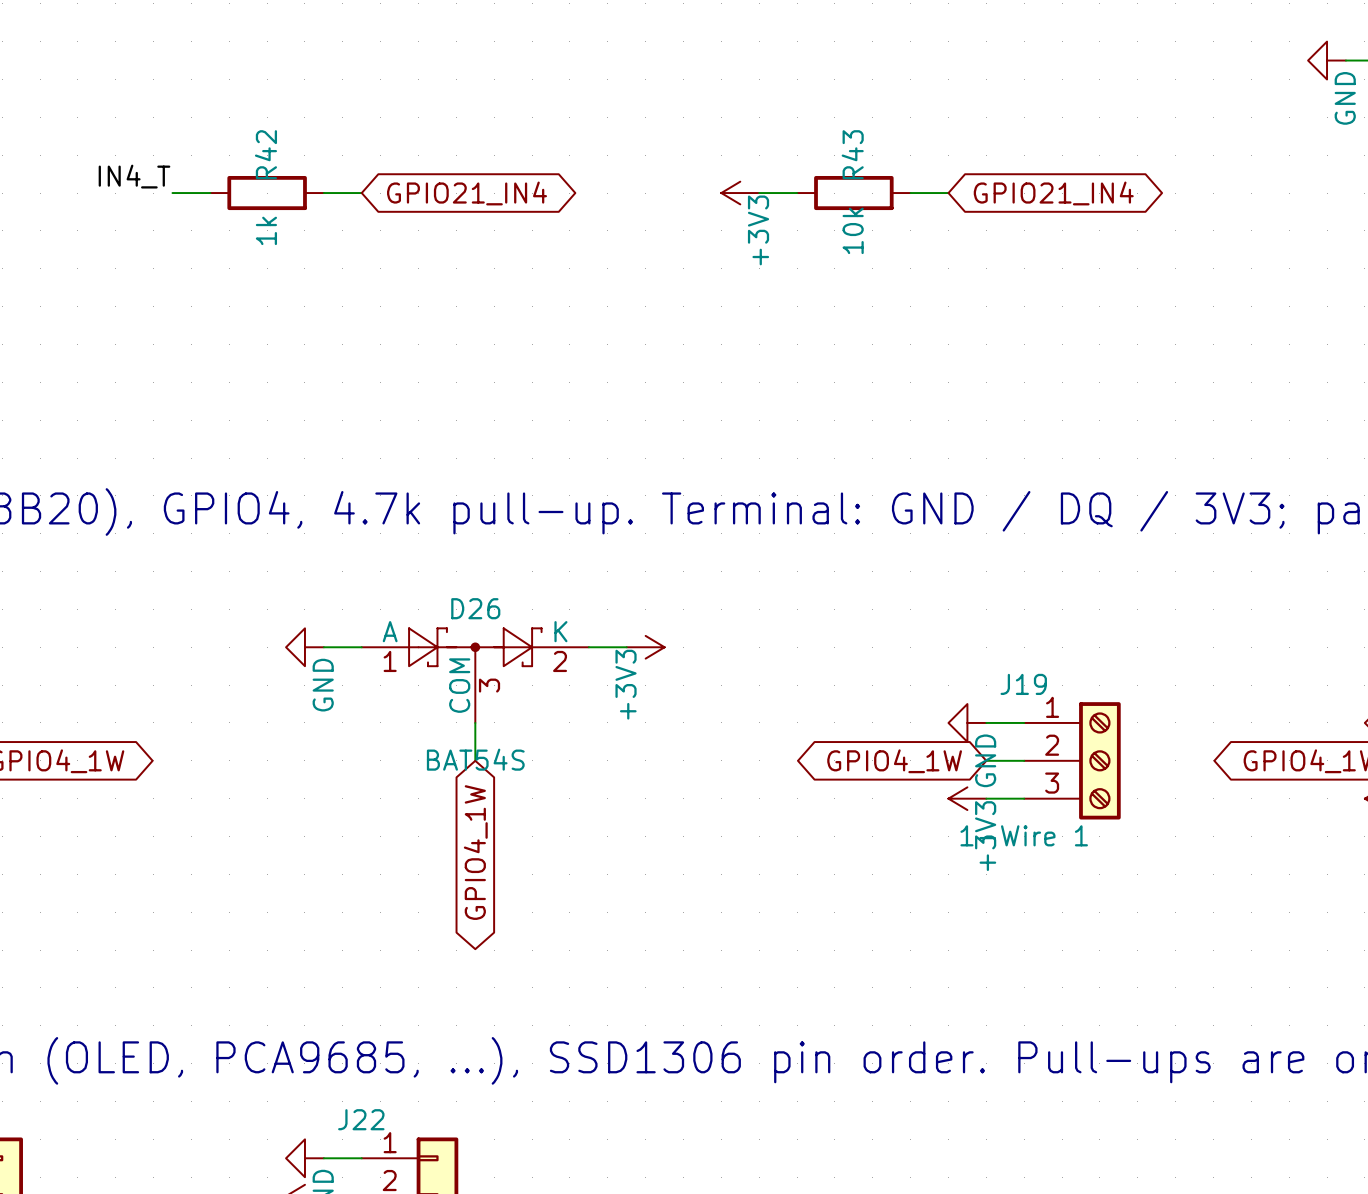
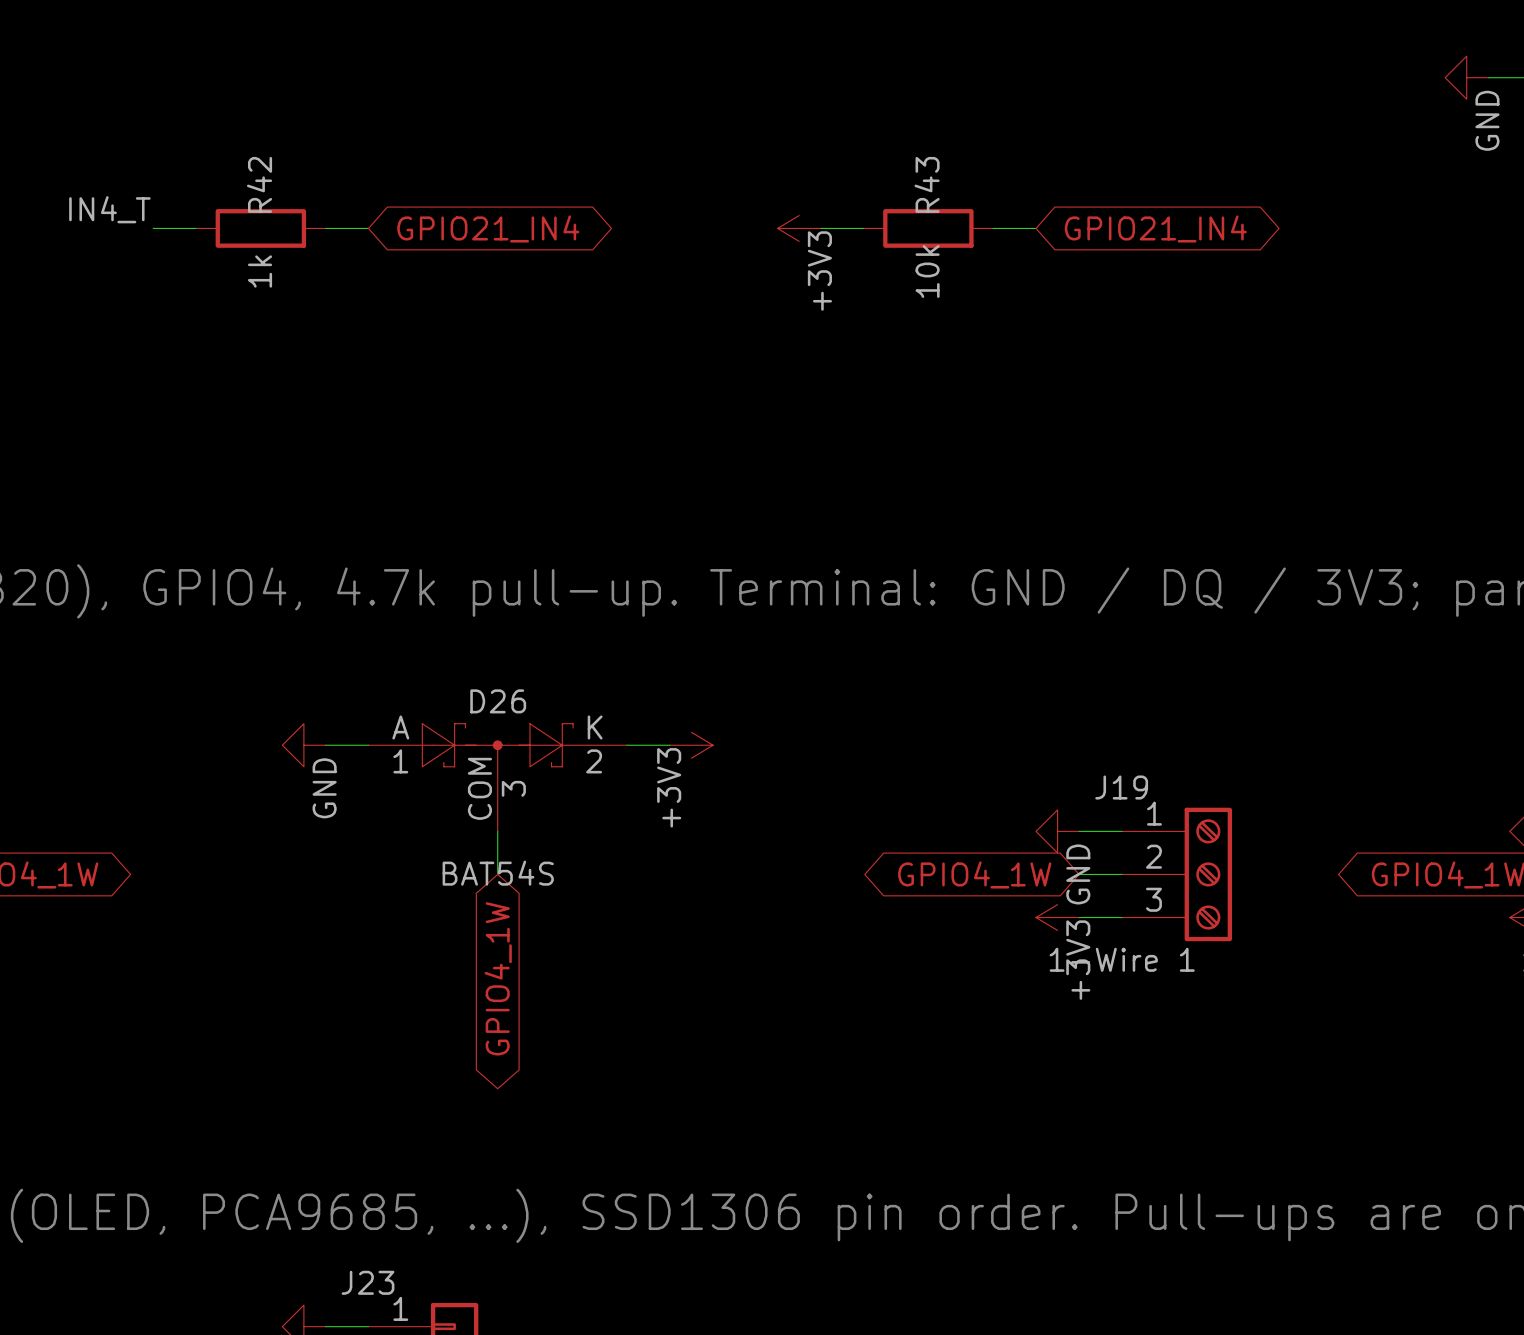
J22 name: J22 (361, 1119) -> J23 (367, 1282)

